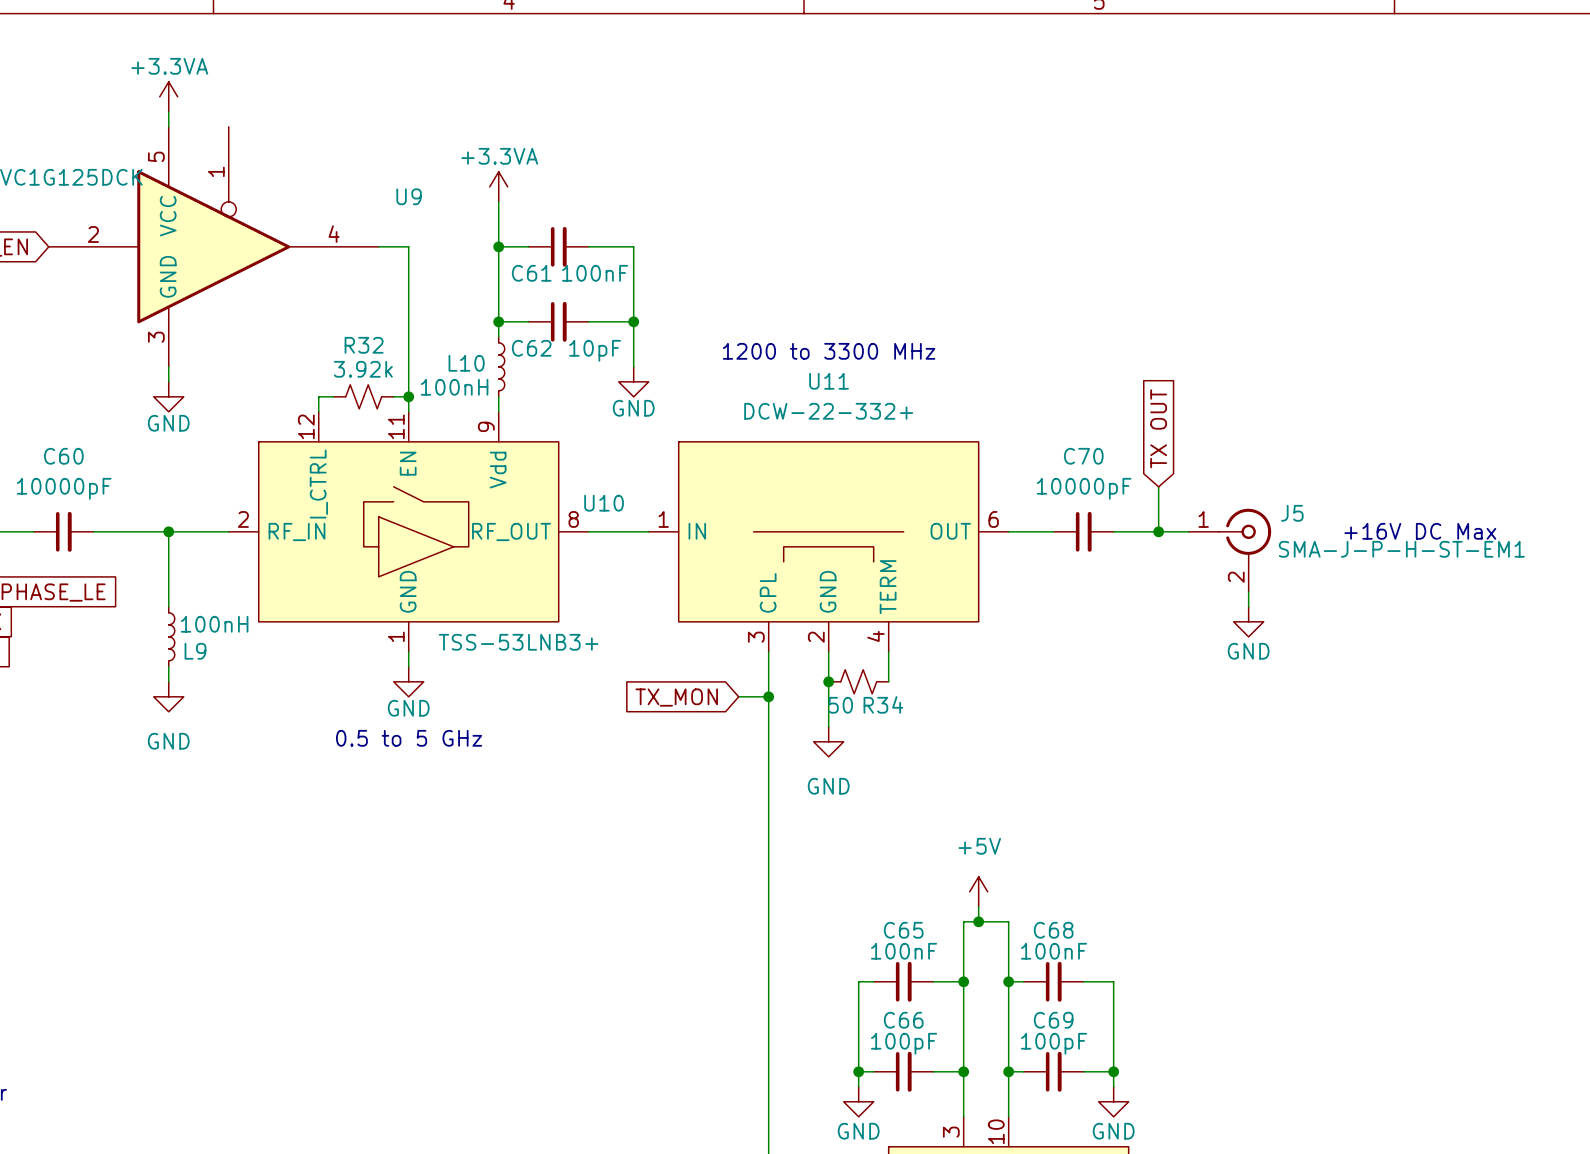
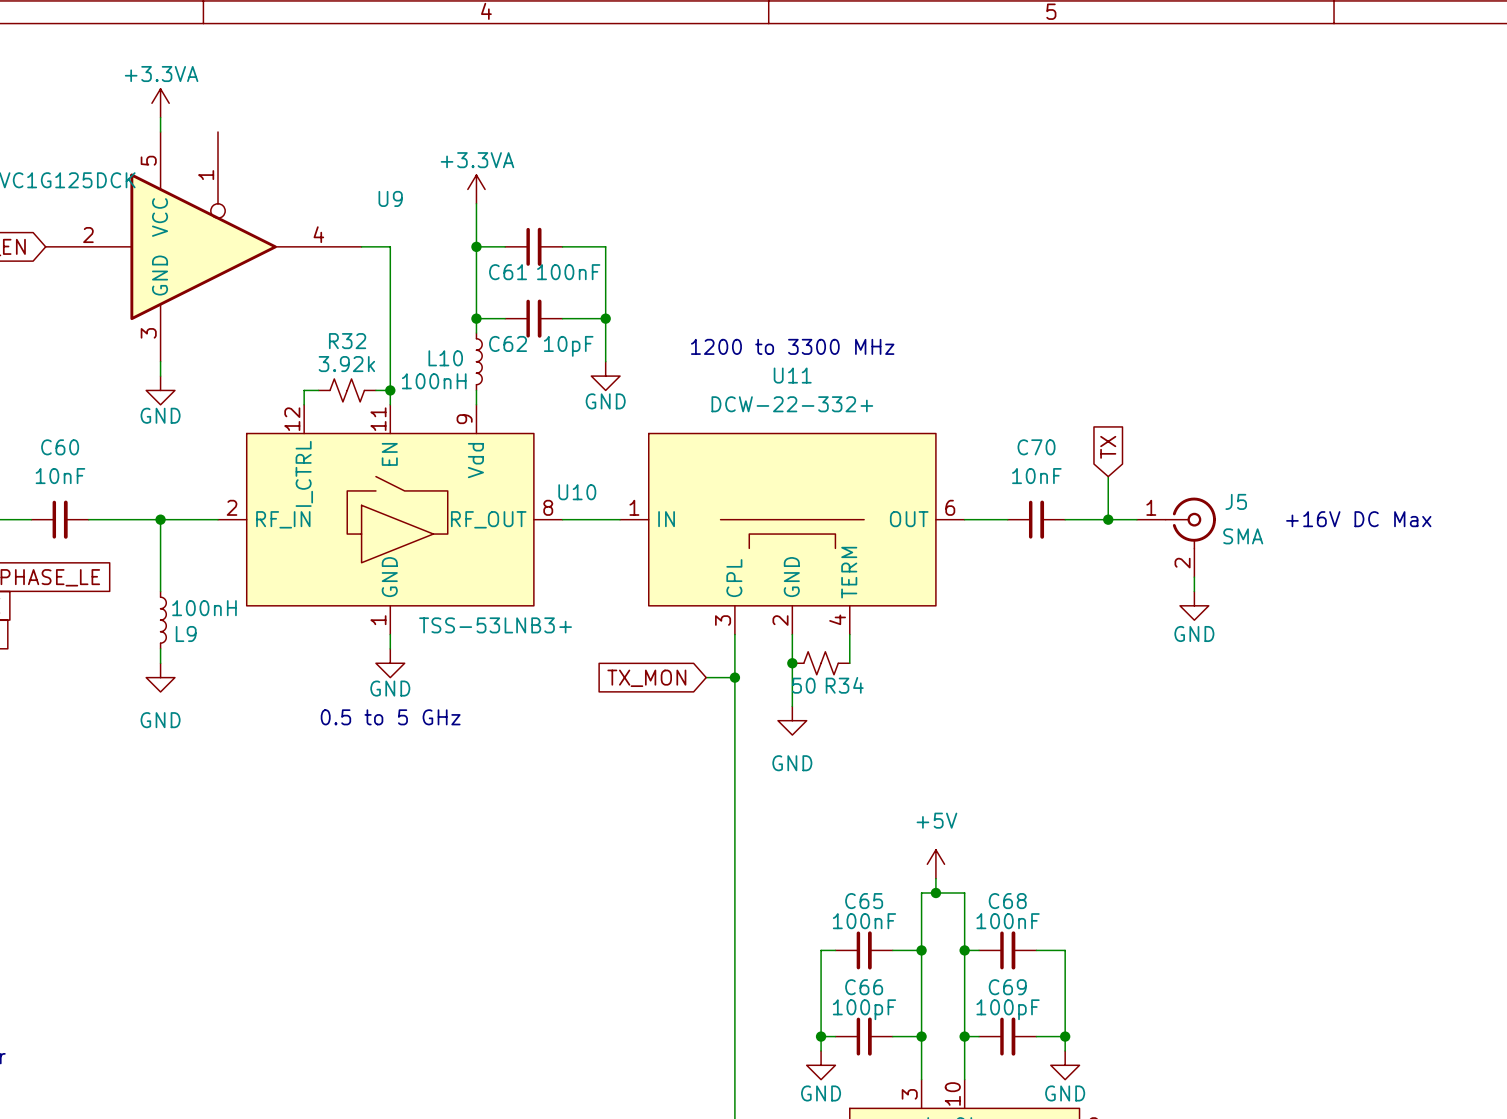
global label: TX OUT (1158, 428) -> TX (1108, 447)
C60 value: 10000pF (64, 488) -> 10nF (60, 476)
C70 value: 10000pF (1084, 488) -> 10nF (1036, 476)
J5 value: SMA-J-P-H-ST-EM1 (1401, 549) -> SMA (1243, 536)

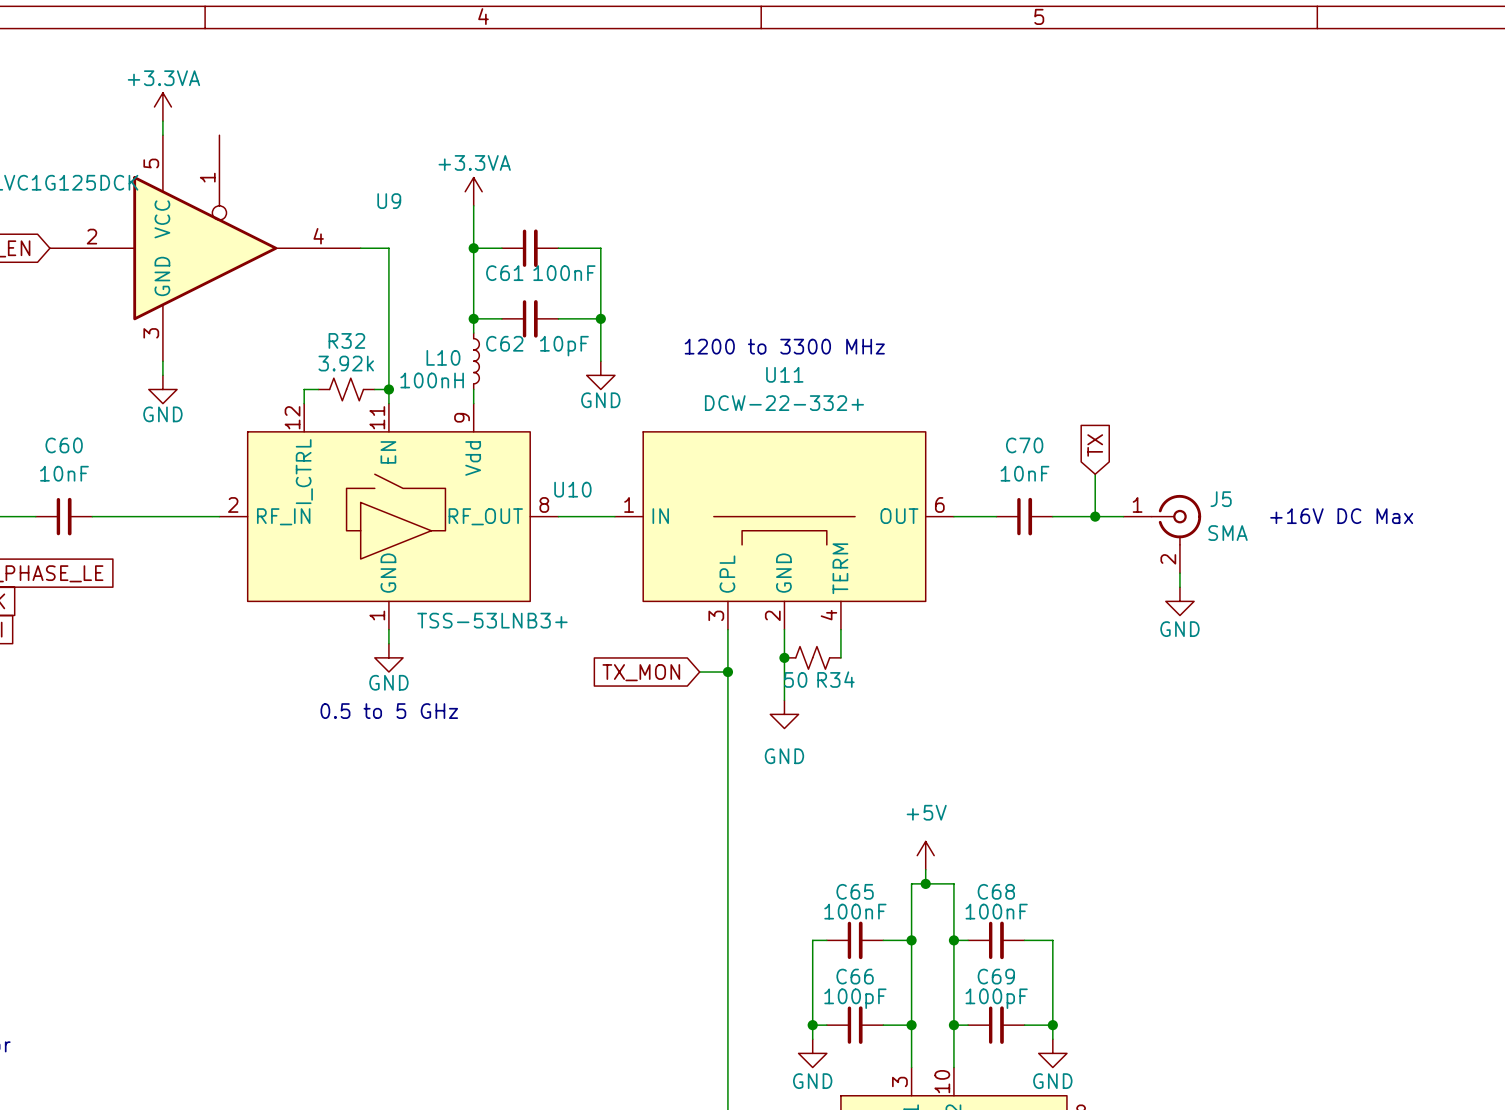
wire: (160, 519) (160, 591) -> none
junction: (160, 519) -> none
L9: 100nH (163, 620) -> none
wire: (160, 648) (160, 663) -> none
power symbol: GND (160, 677) -> none

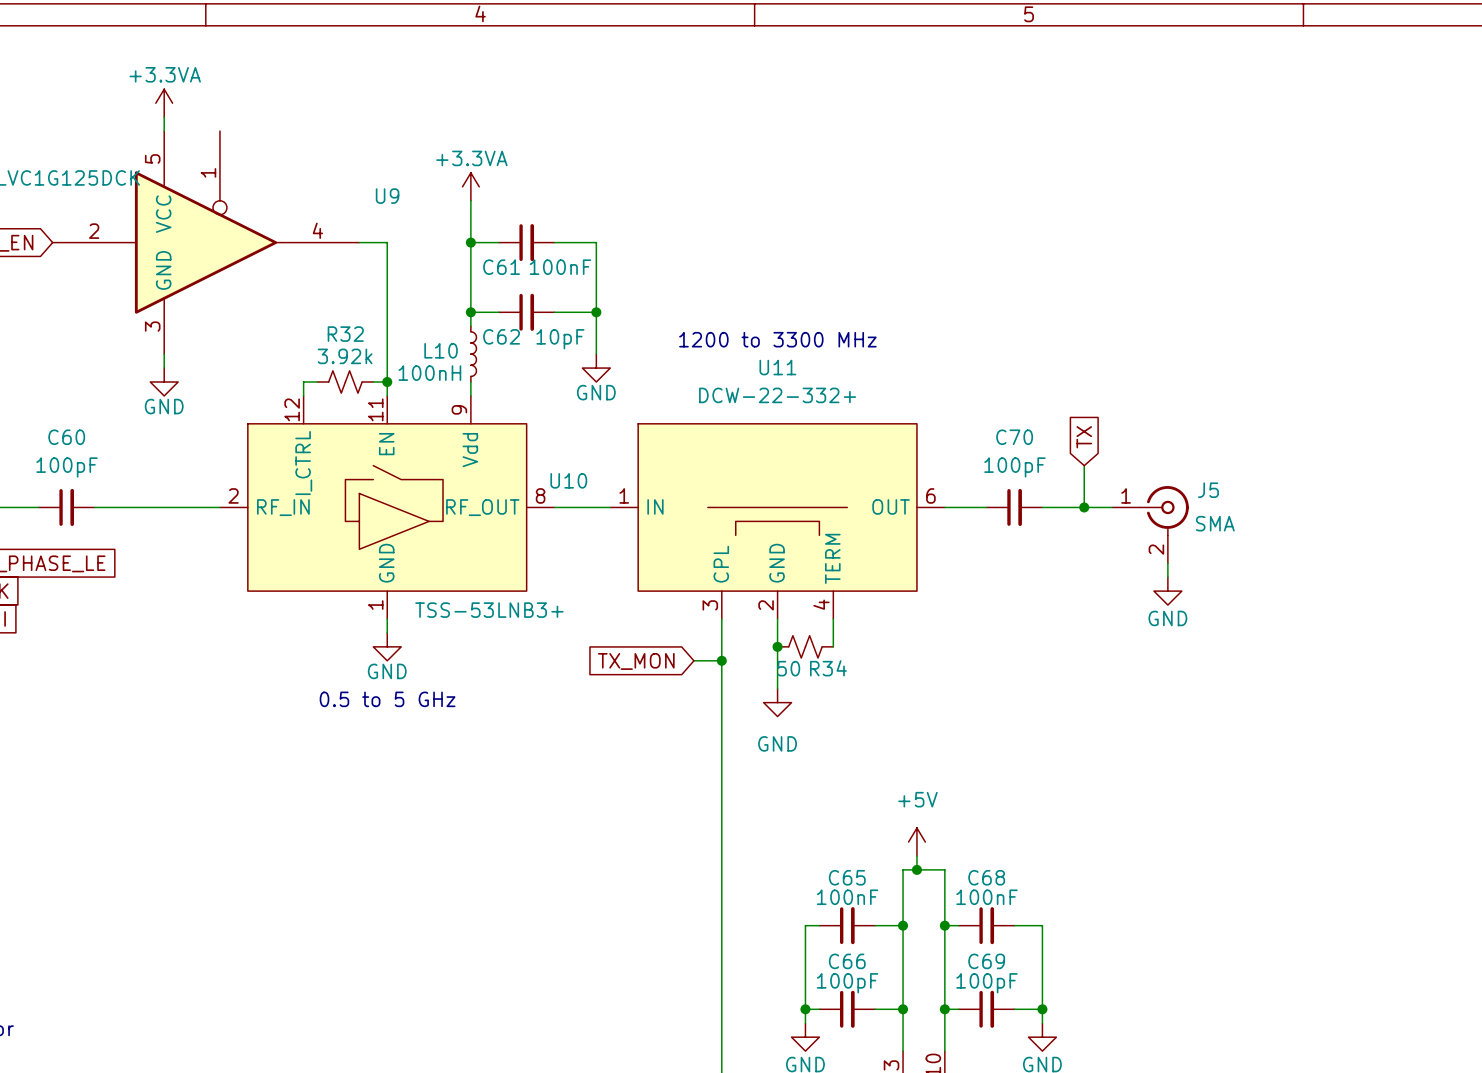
C60 value: 10nF (64, 473) -> 100pF (67, 467)
C70 value: 10nF (1024, 473) -> 100pF (1014, 467)
text: +16V DC Max (1341, 516) -> none

